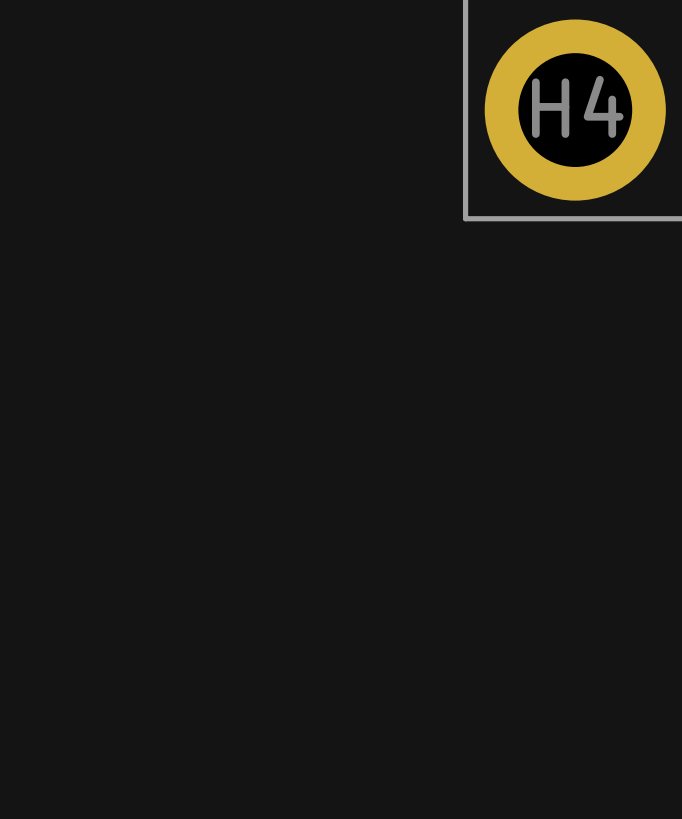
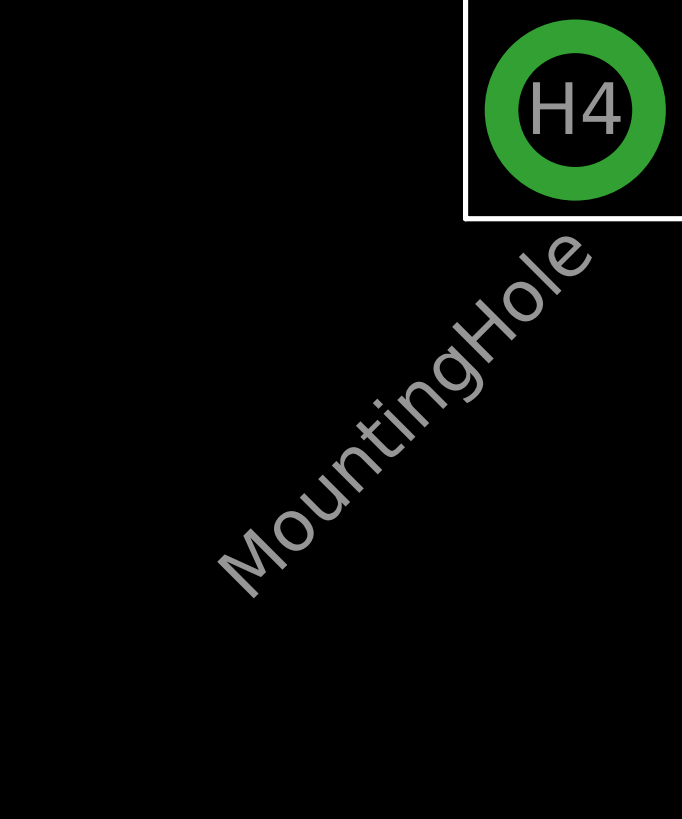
H4 value: none -> MountingHole (404, 417)

